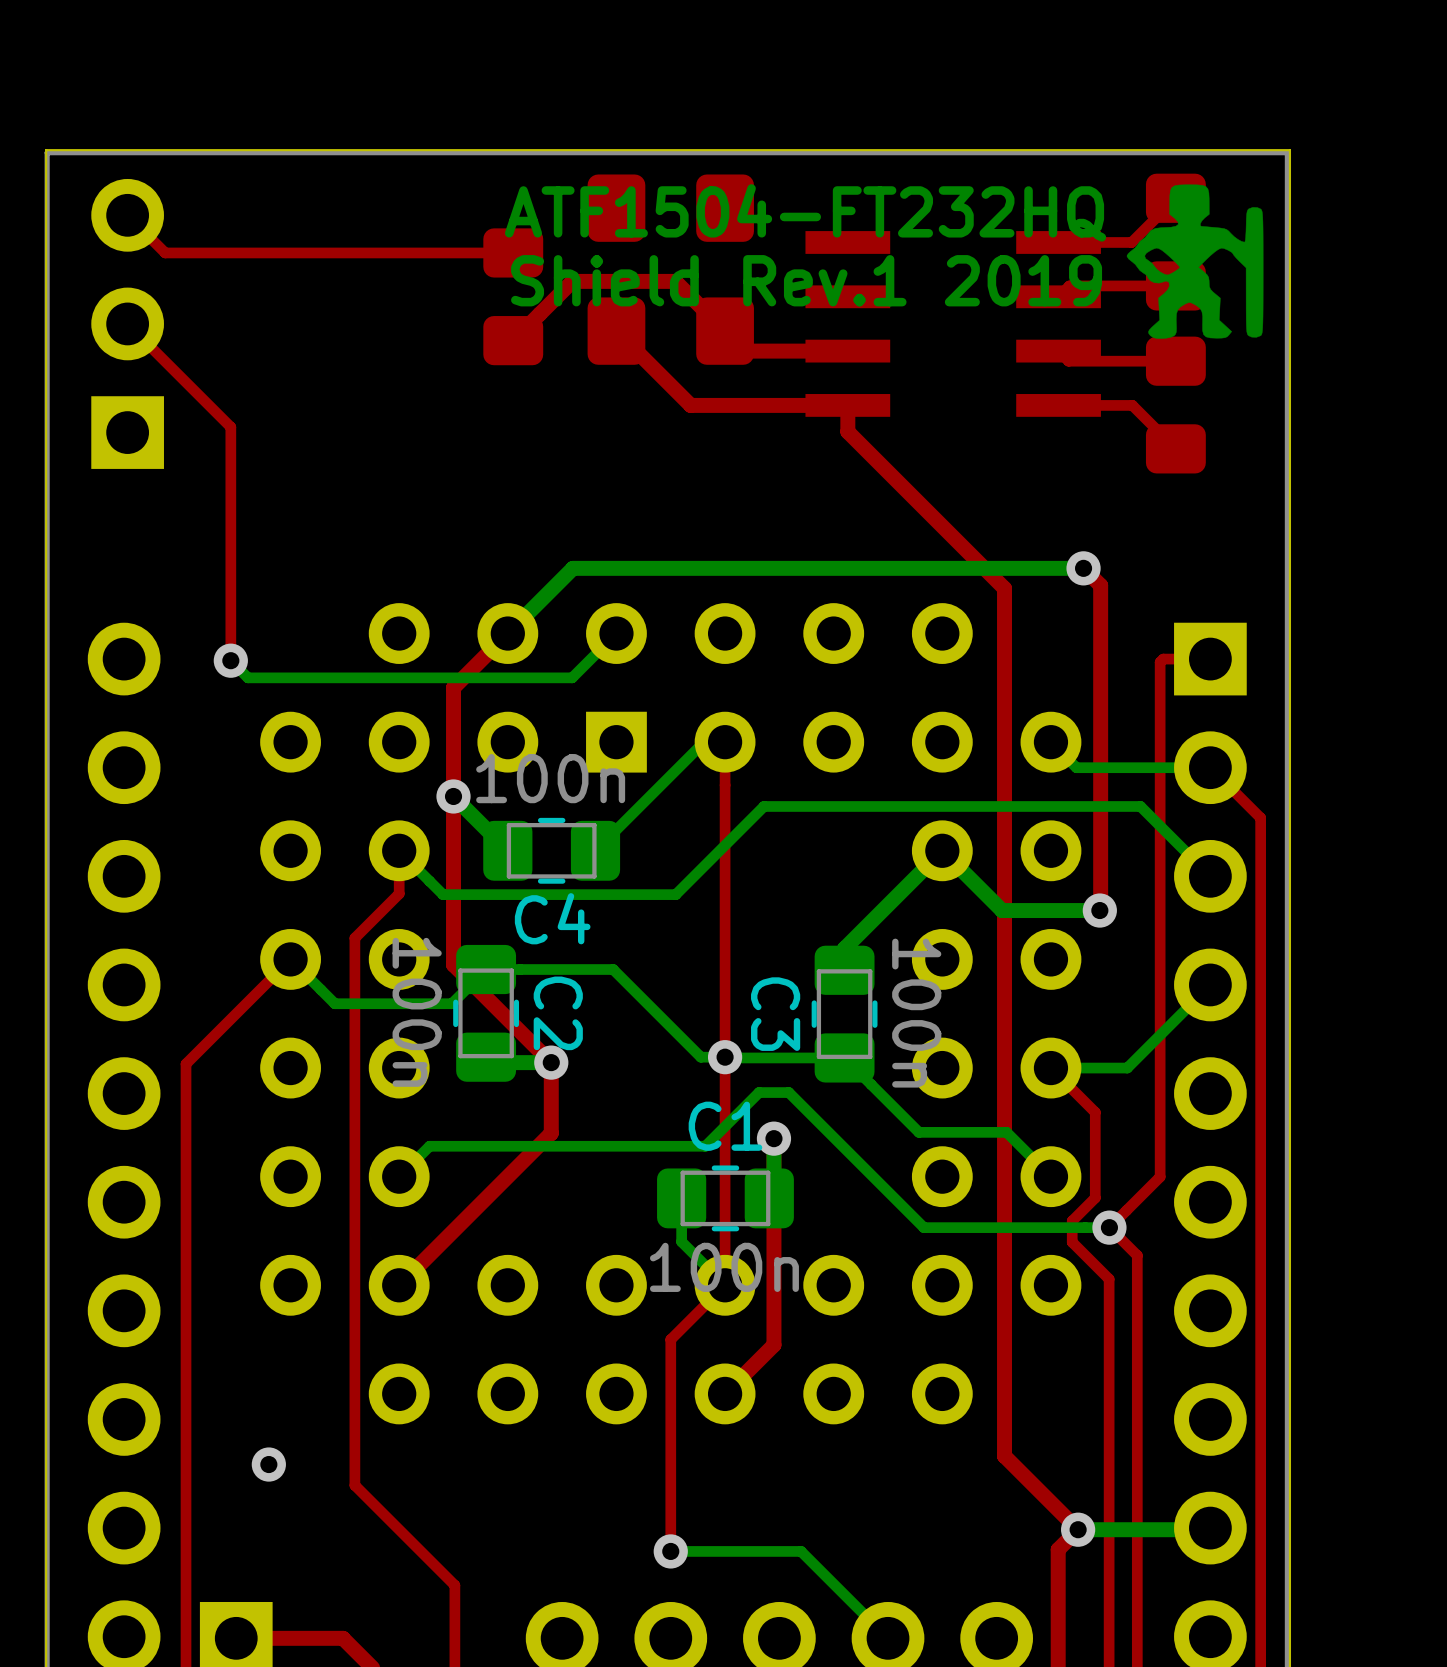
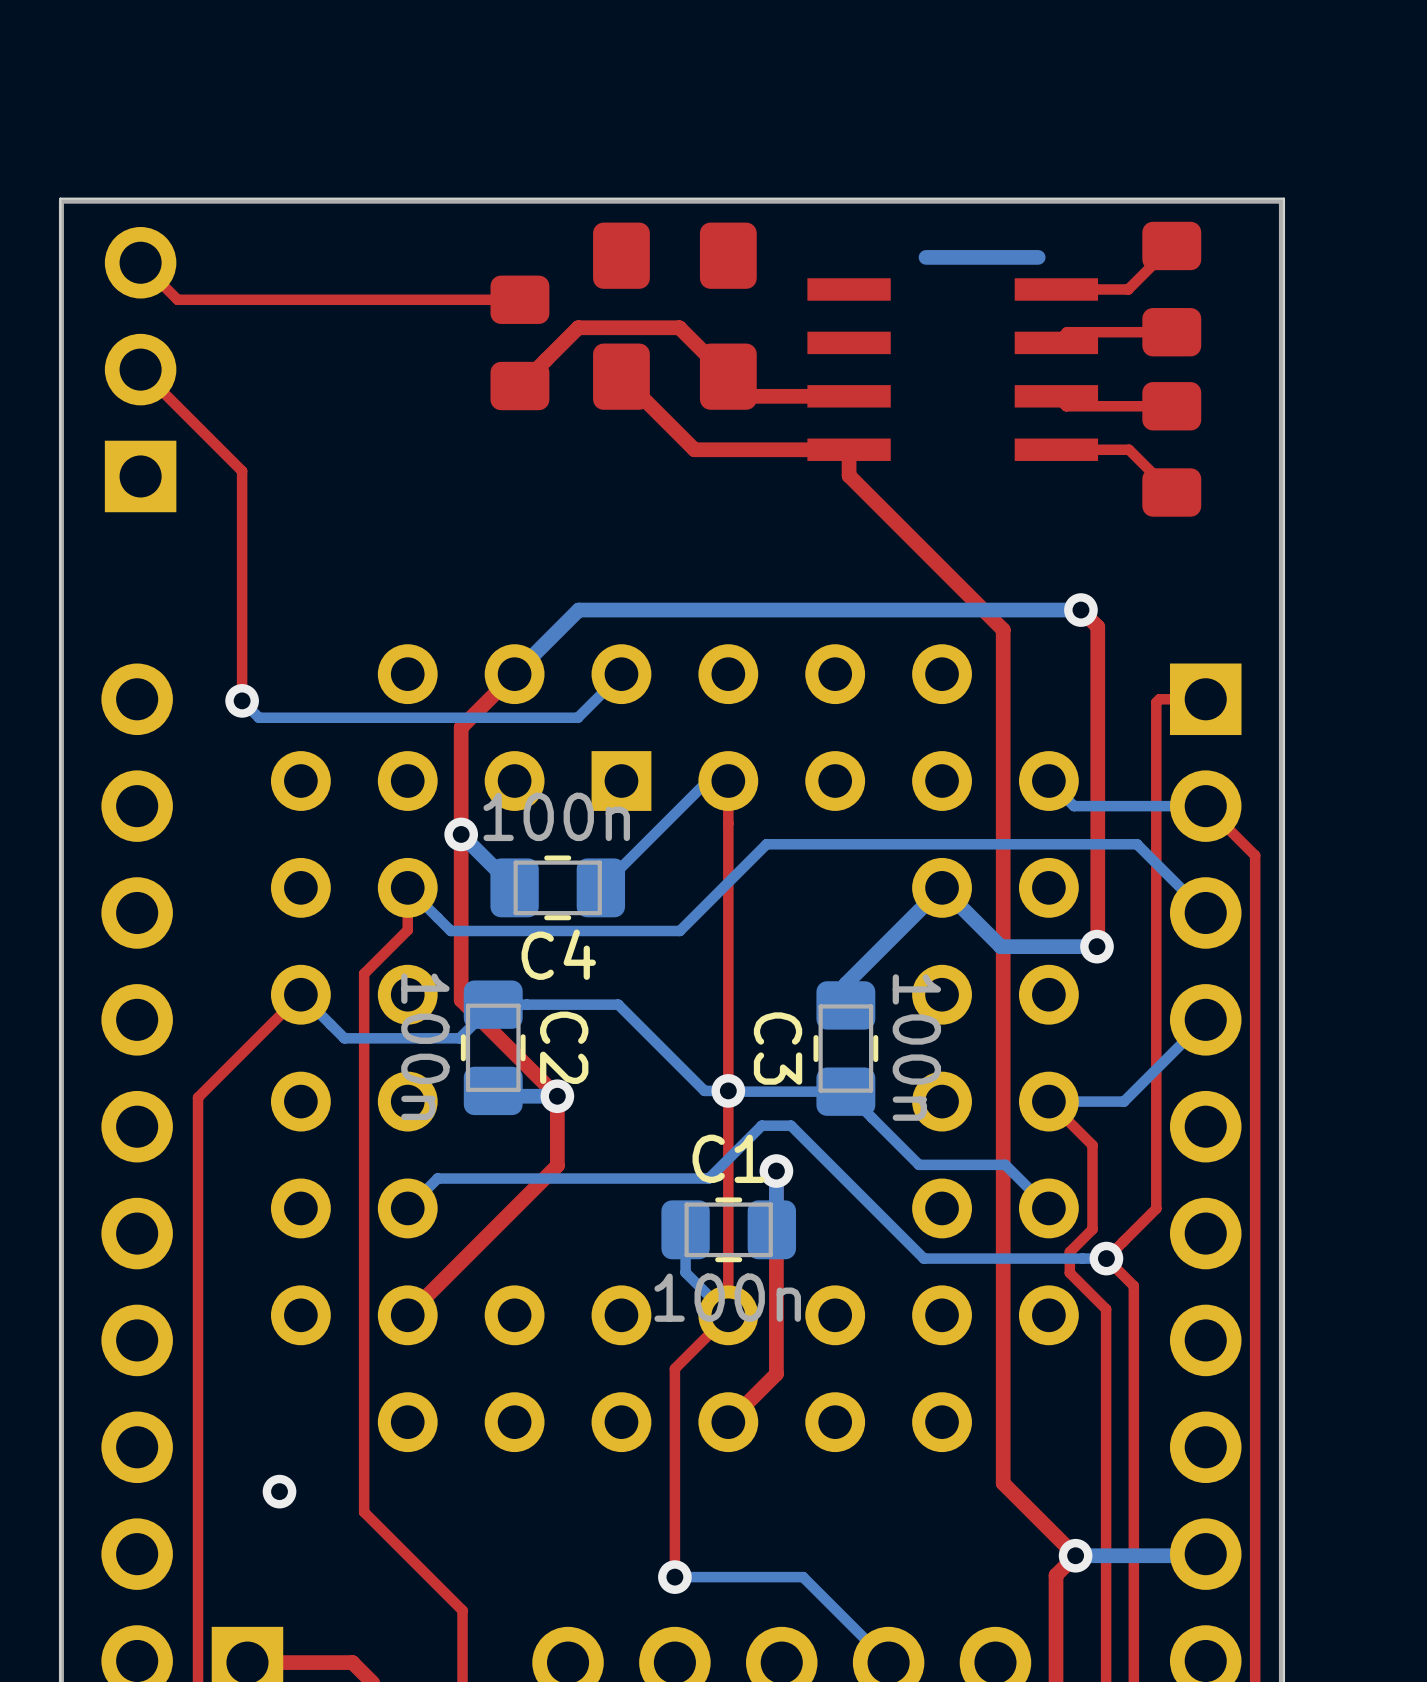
drawing: [1126, 184, 1264, 339] -> none
bottom track: none -> (1038, 257) (926, 257)
text: ATF1504-FT232HQ (805, 212) -> none
text: Shield Rev.1 2019 (806, 280) -> none

